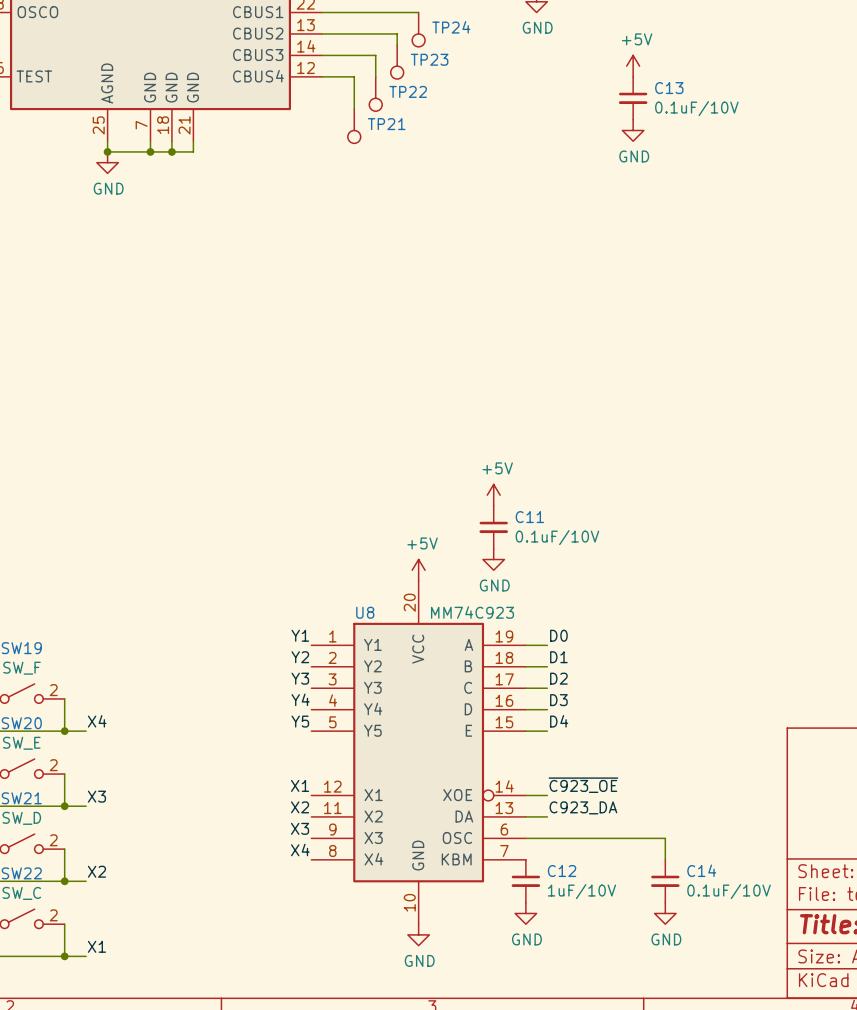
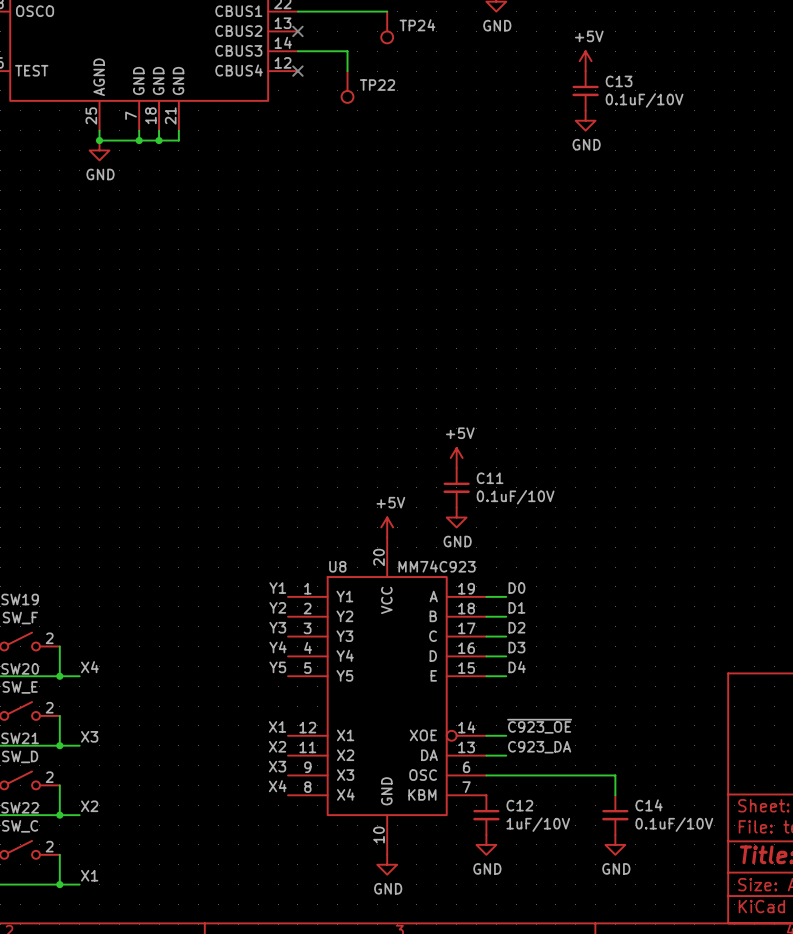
wire: (322, 33) (397, 33) (397, 44) -> none
no-connect mark: none -> (297, 31)
TP23: (397, 61) -> none
wire: (322, 76) (354, 76) (354, 109) -> none
no-connect mark: none -> (297, 71)
TP21: (354, 126) -> none

